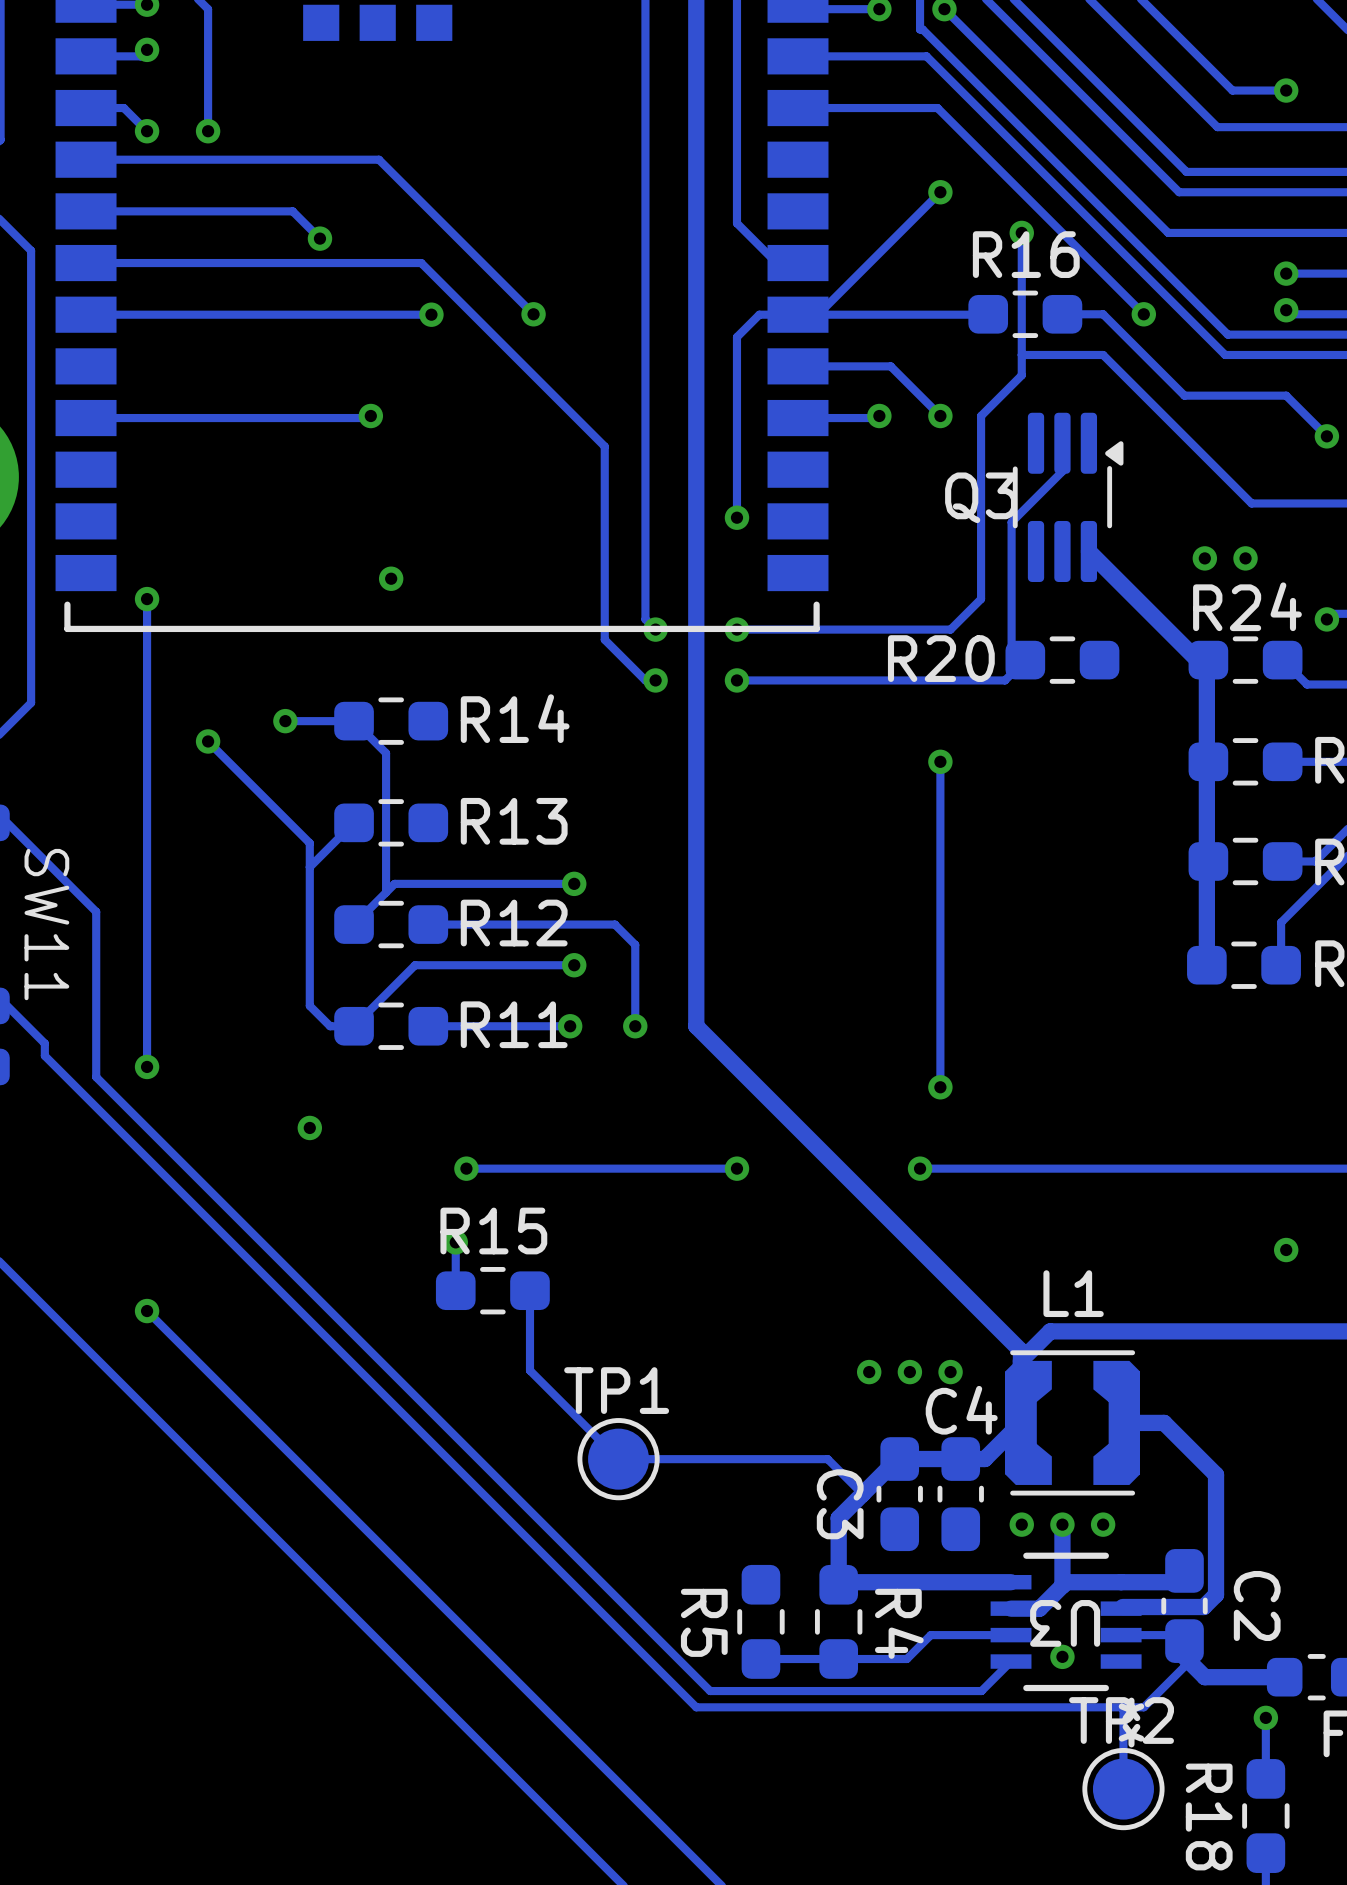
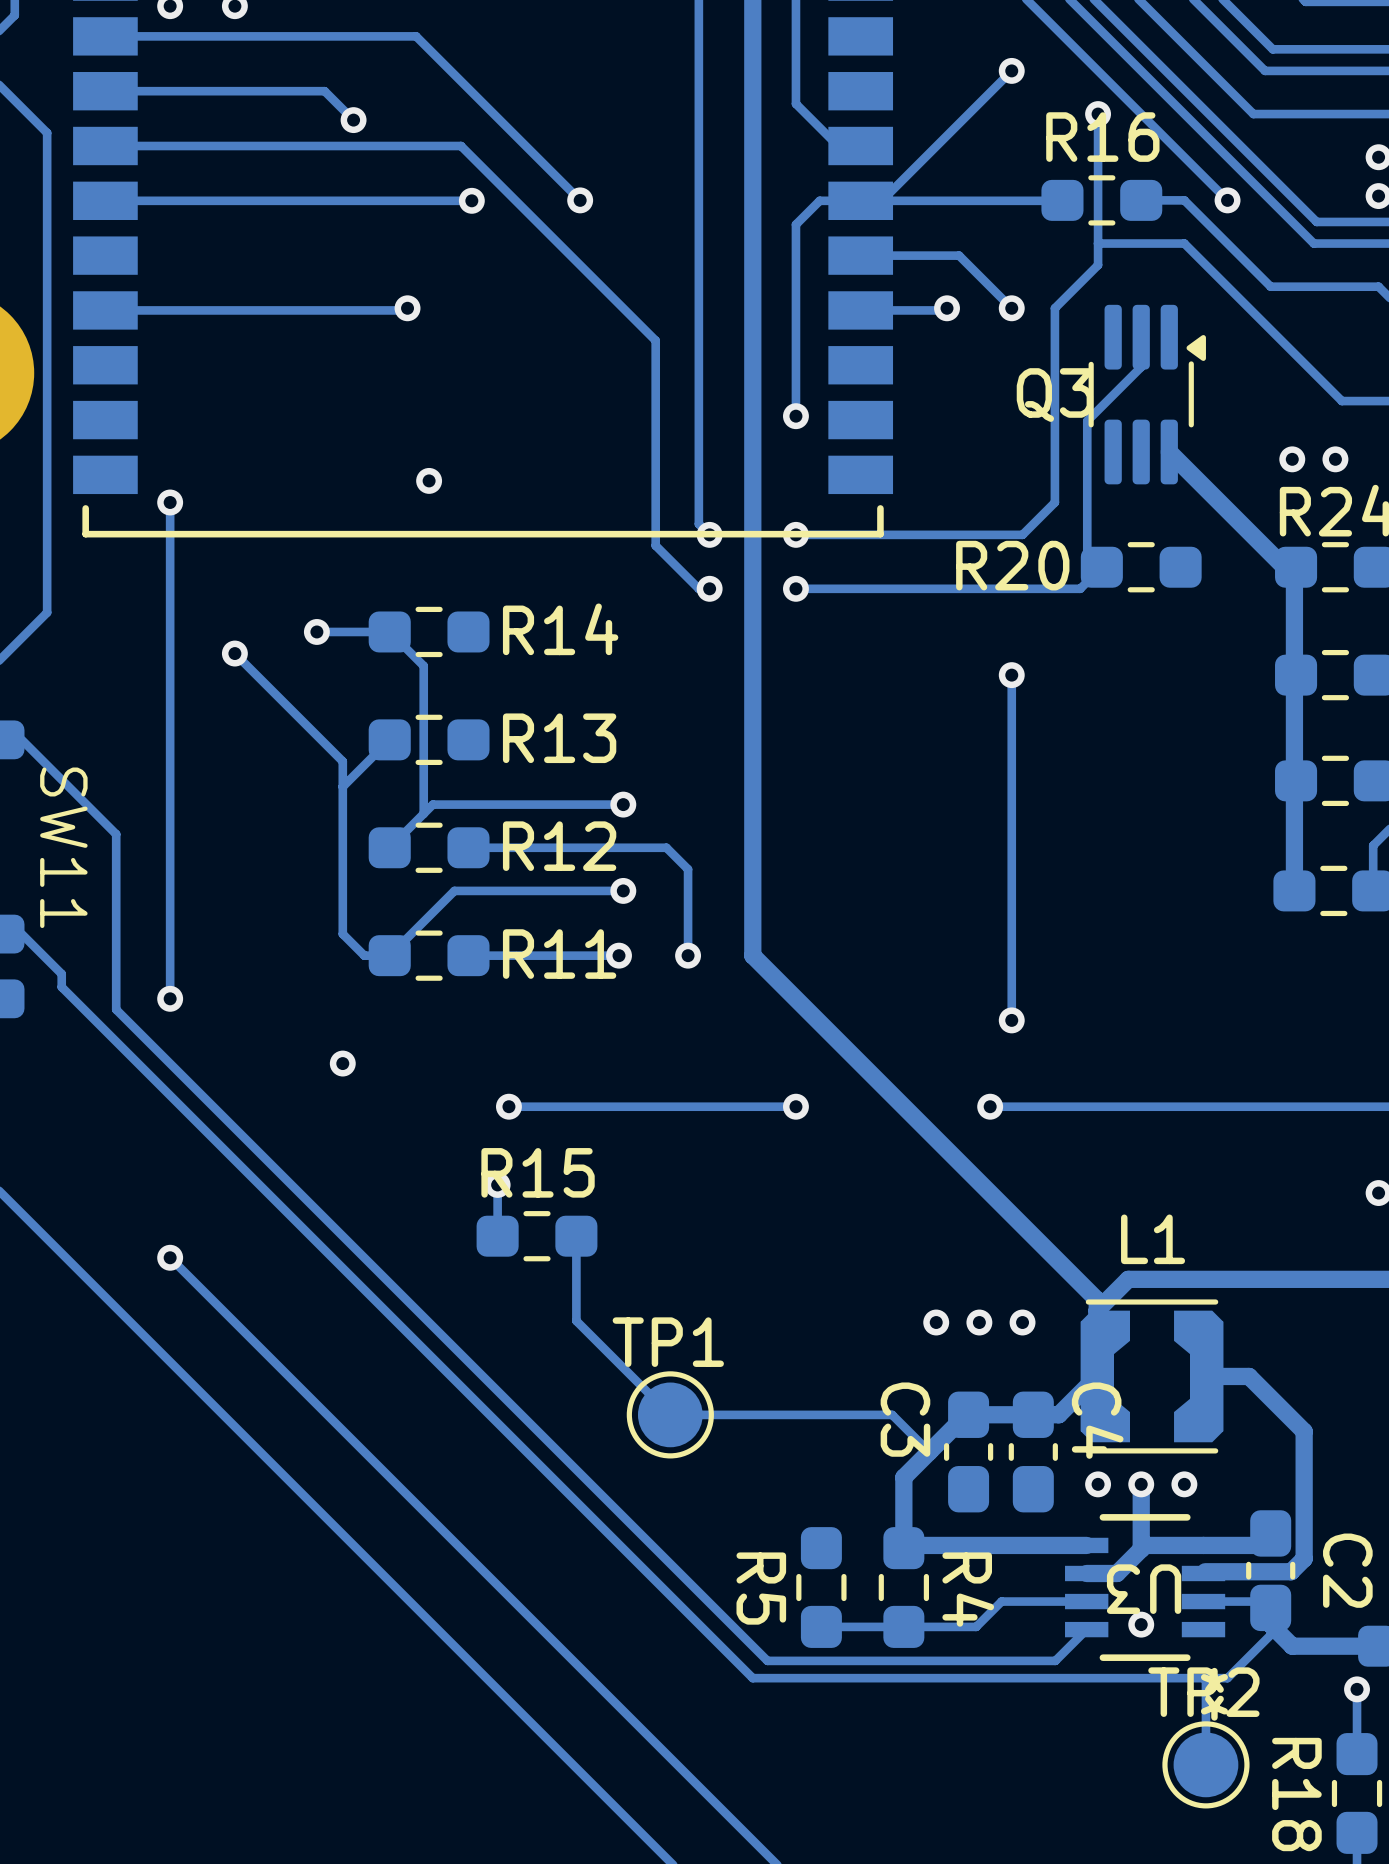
C4 name rotation: 0° (961, 1410) -> 90° clockwise (1097, 1420)
C3 name position: C3 (840, 1504) -> C3 (905, 1419)

